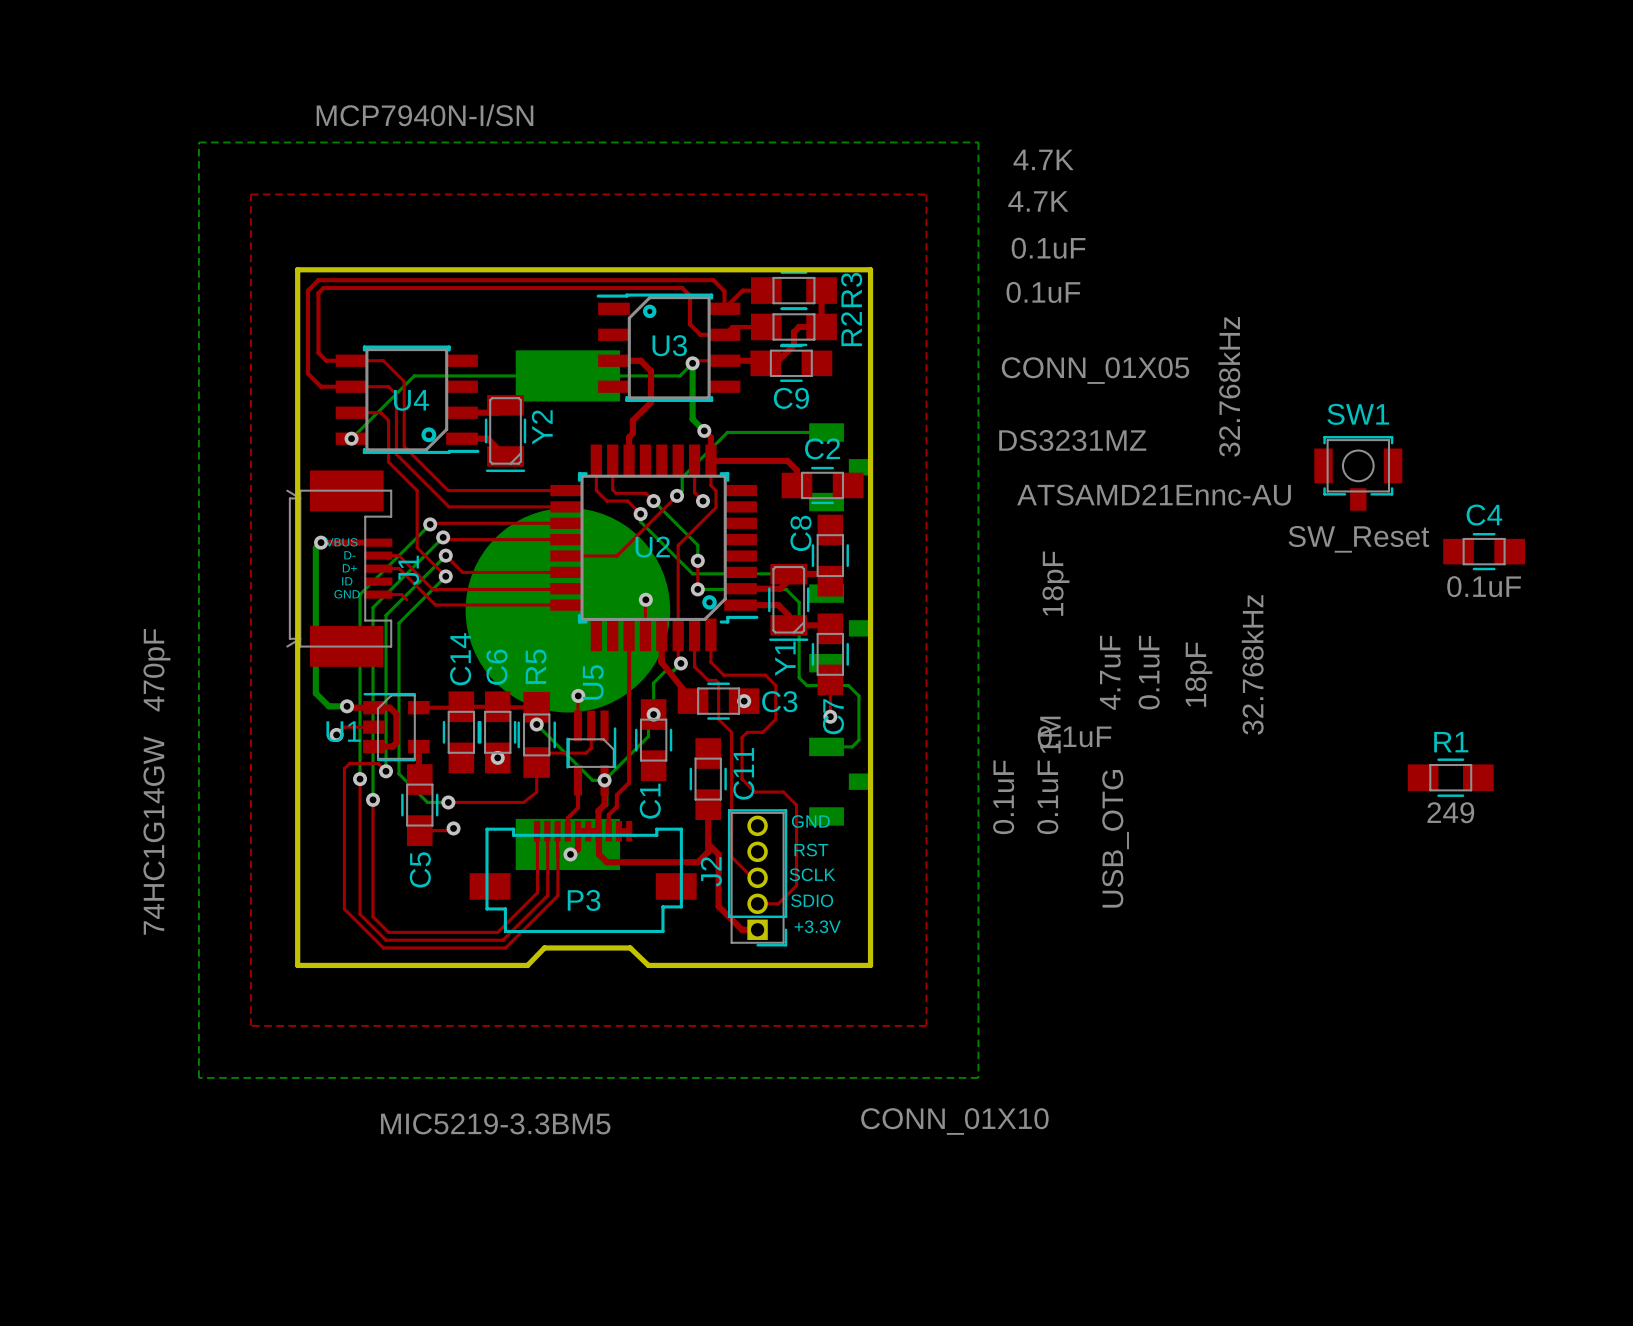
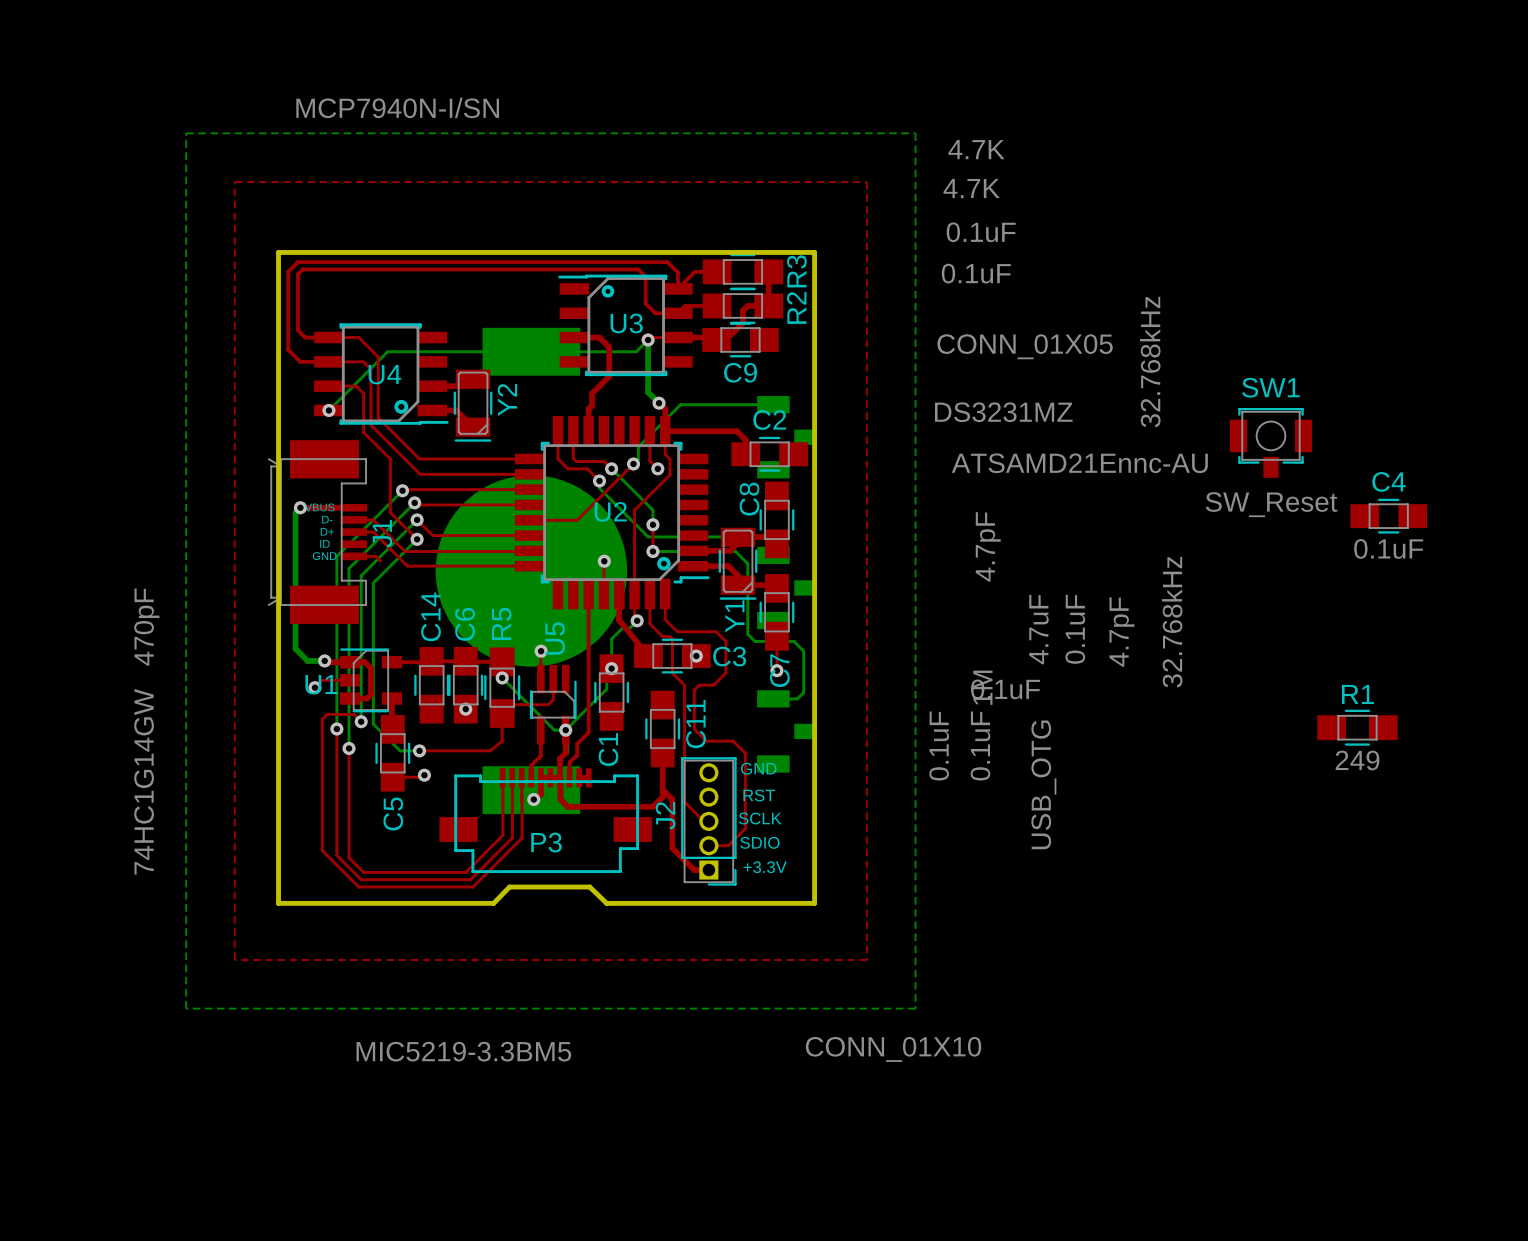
C8 value: 18pF (1055, 583) -> 4.7pF (988, 546)
C7 value: 18pF (1198, 674) -> 4.7pF (1121, 631)

